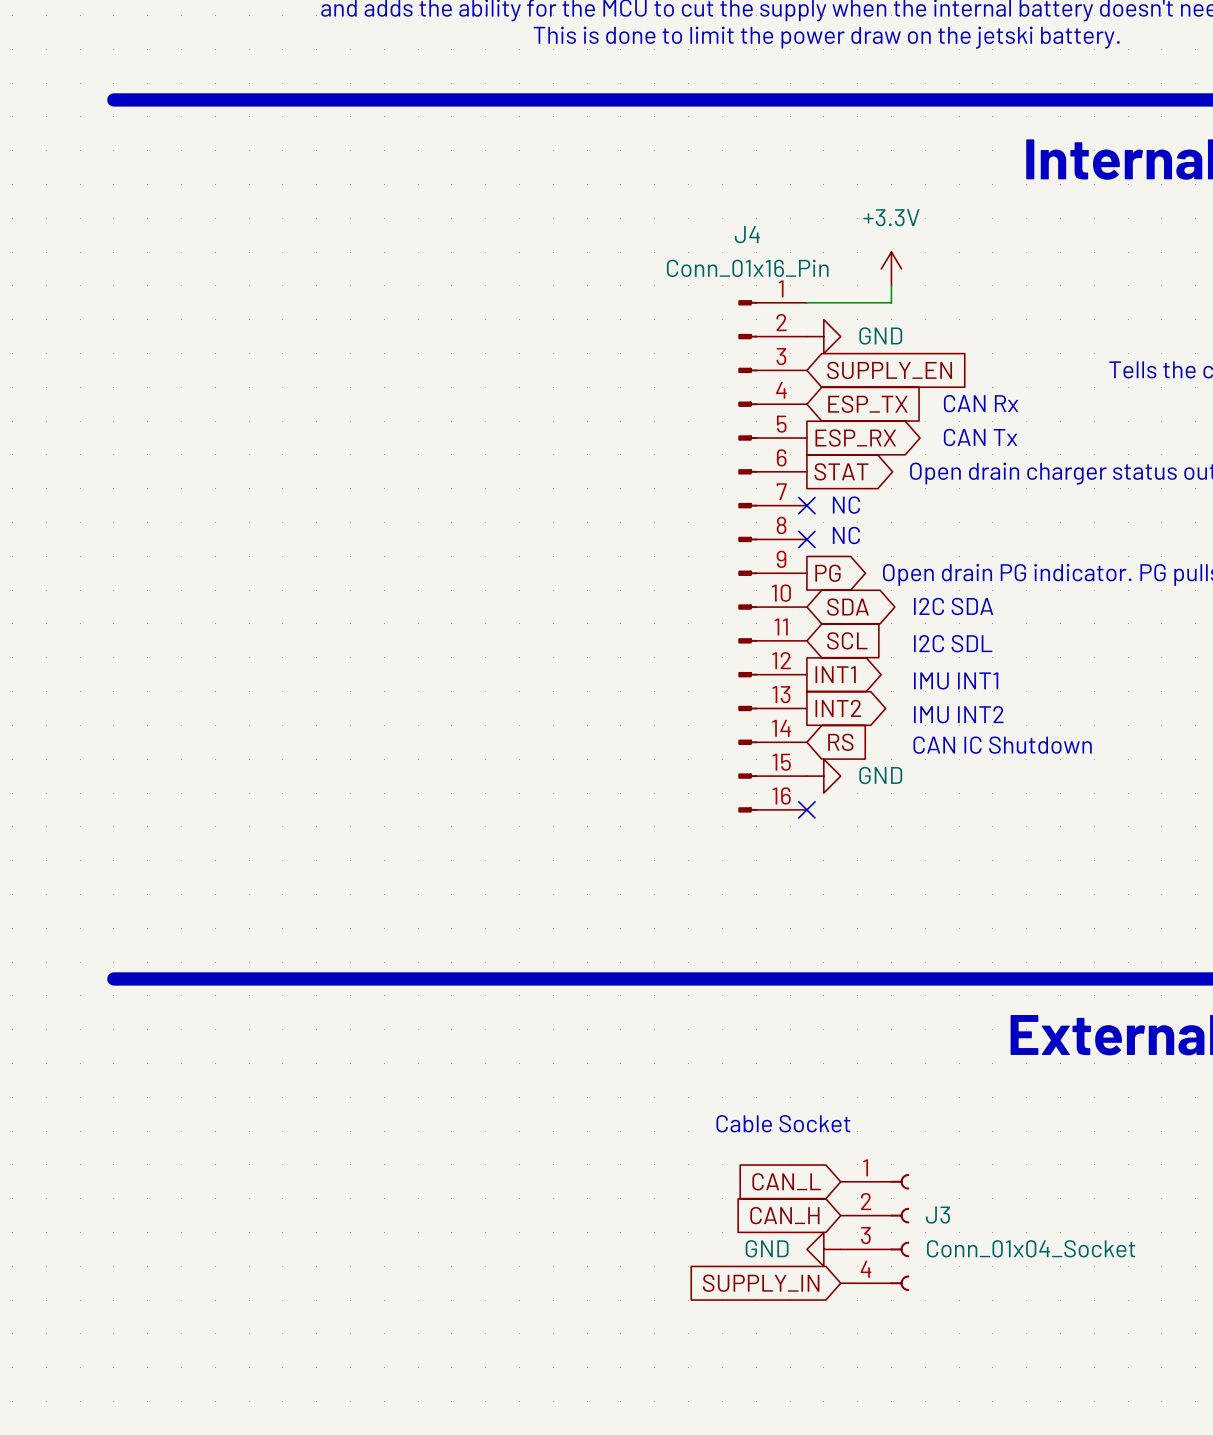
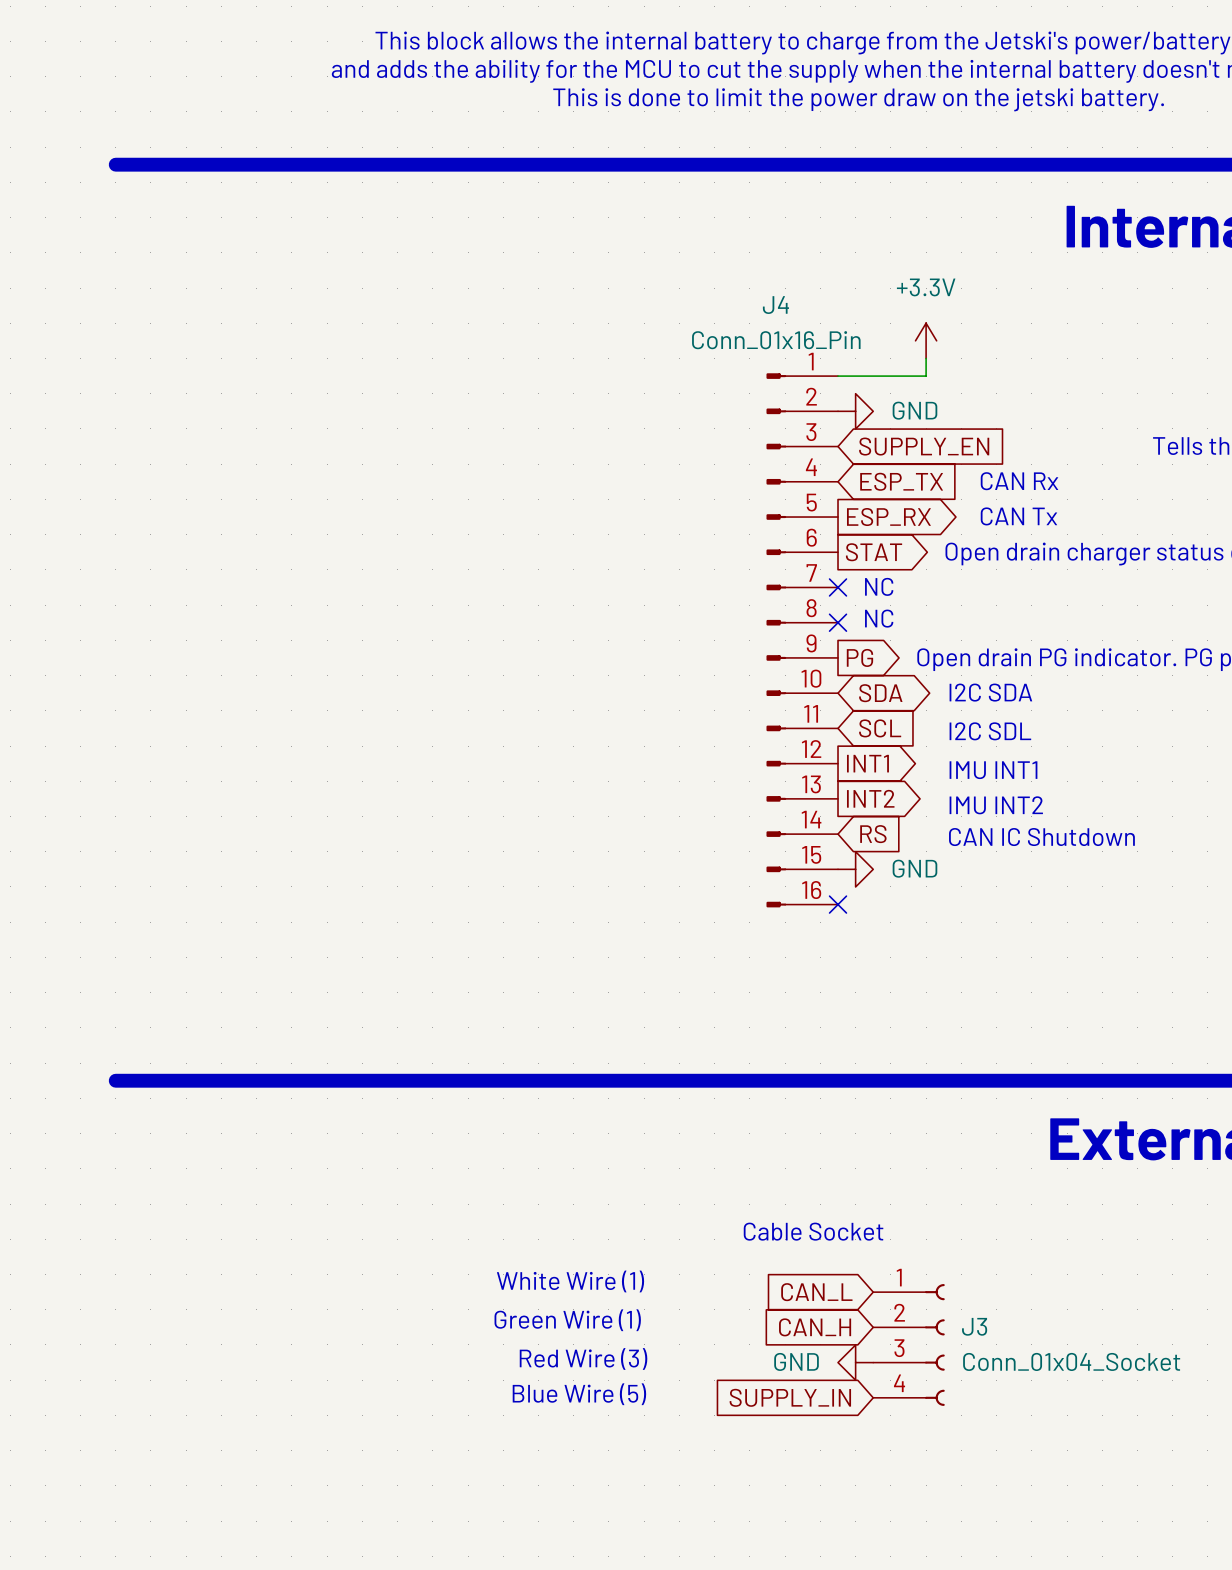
text: none -> White Wire (1) (570, 1281)
text: none -> Green Wire (1) (567, 1320)
text: none -> Red Wire (3) (583, 1358)
text: none -> Blue Wire (5) (579, 1394)

